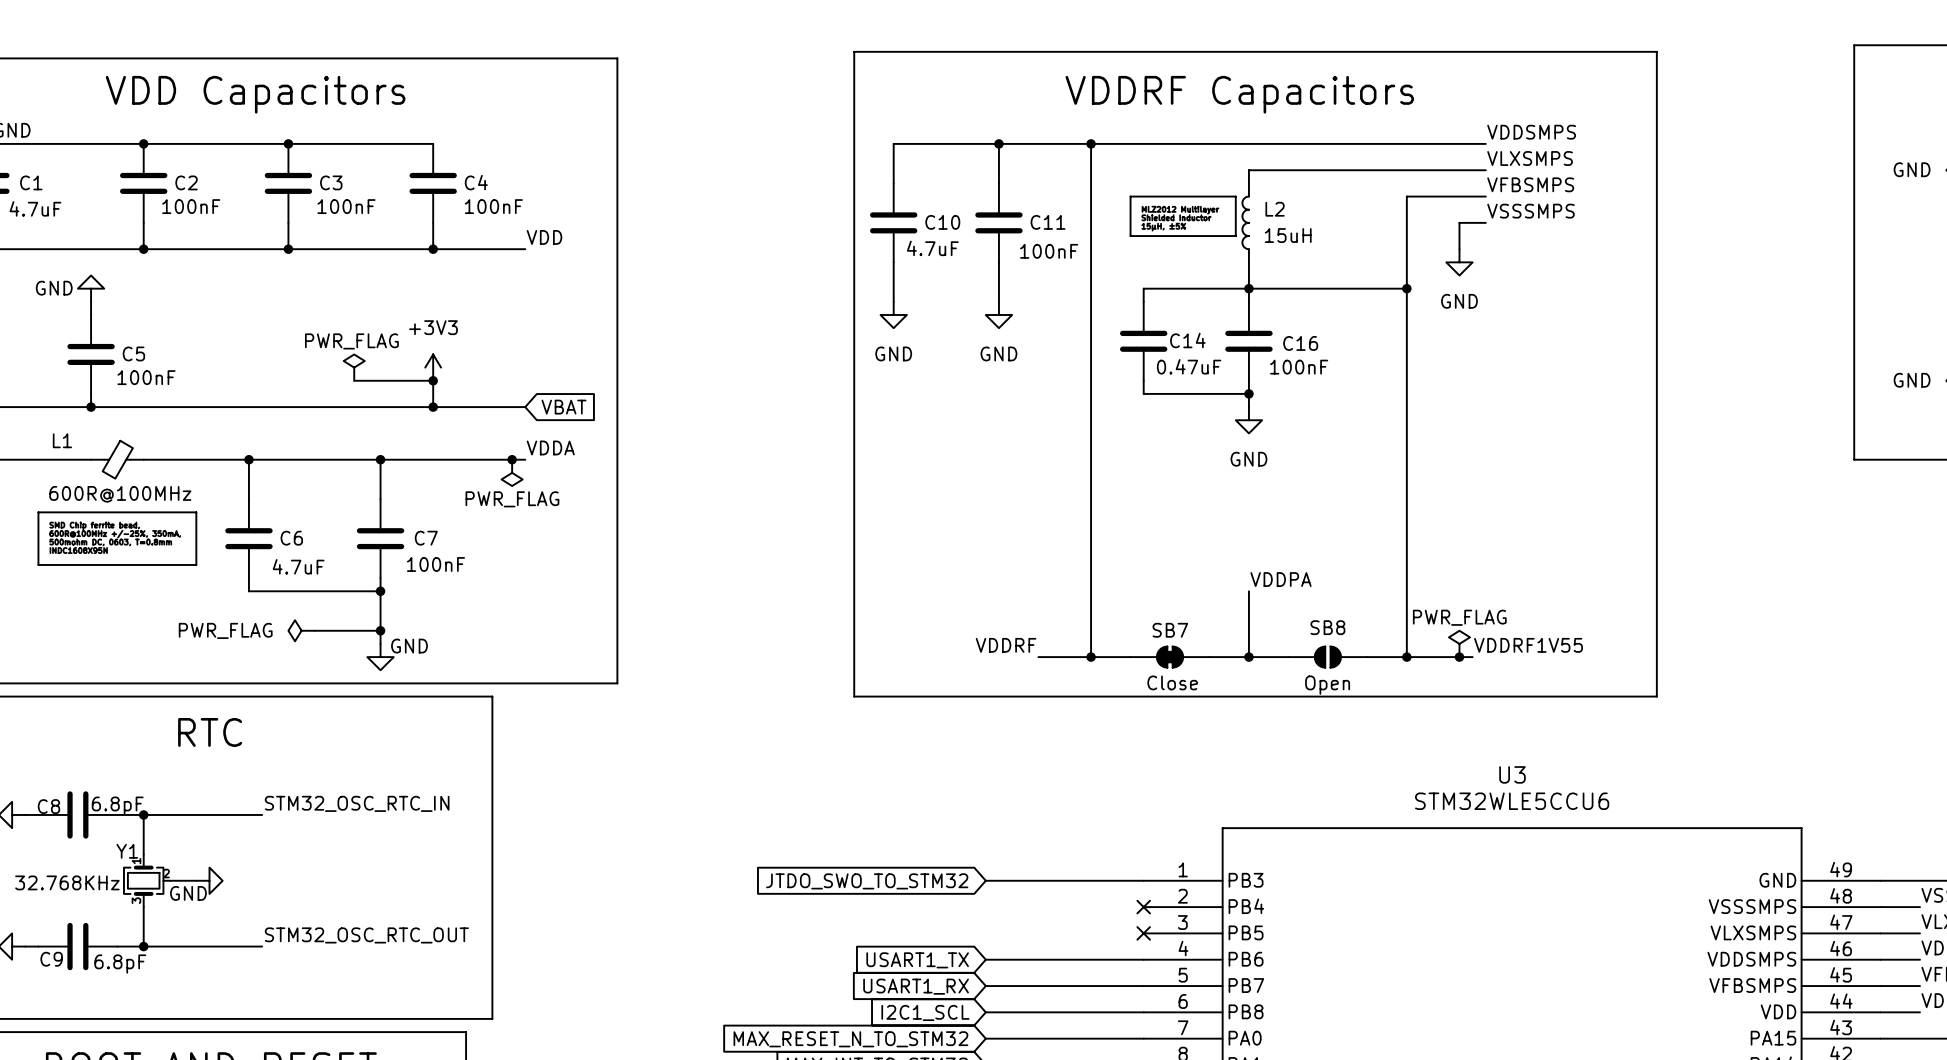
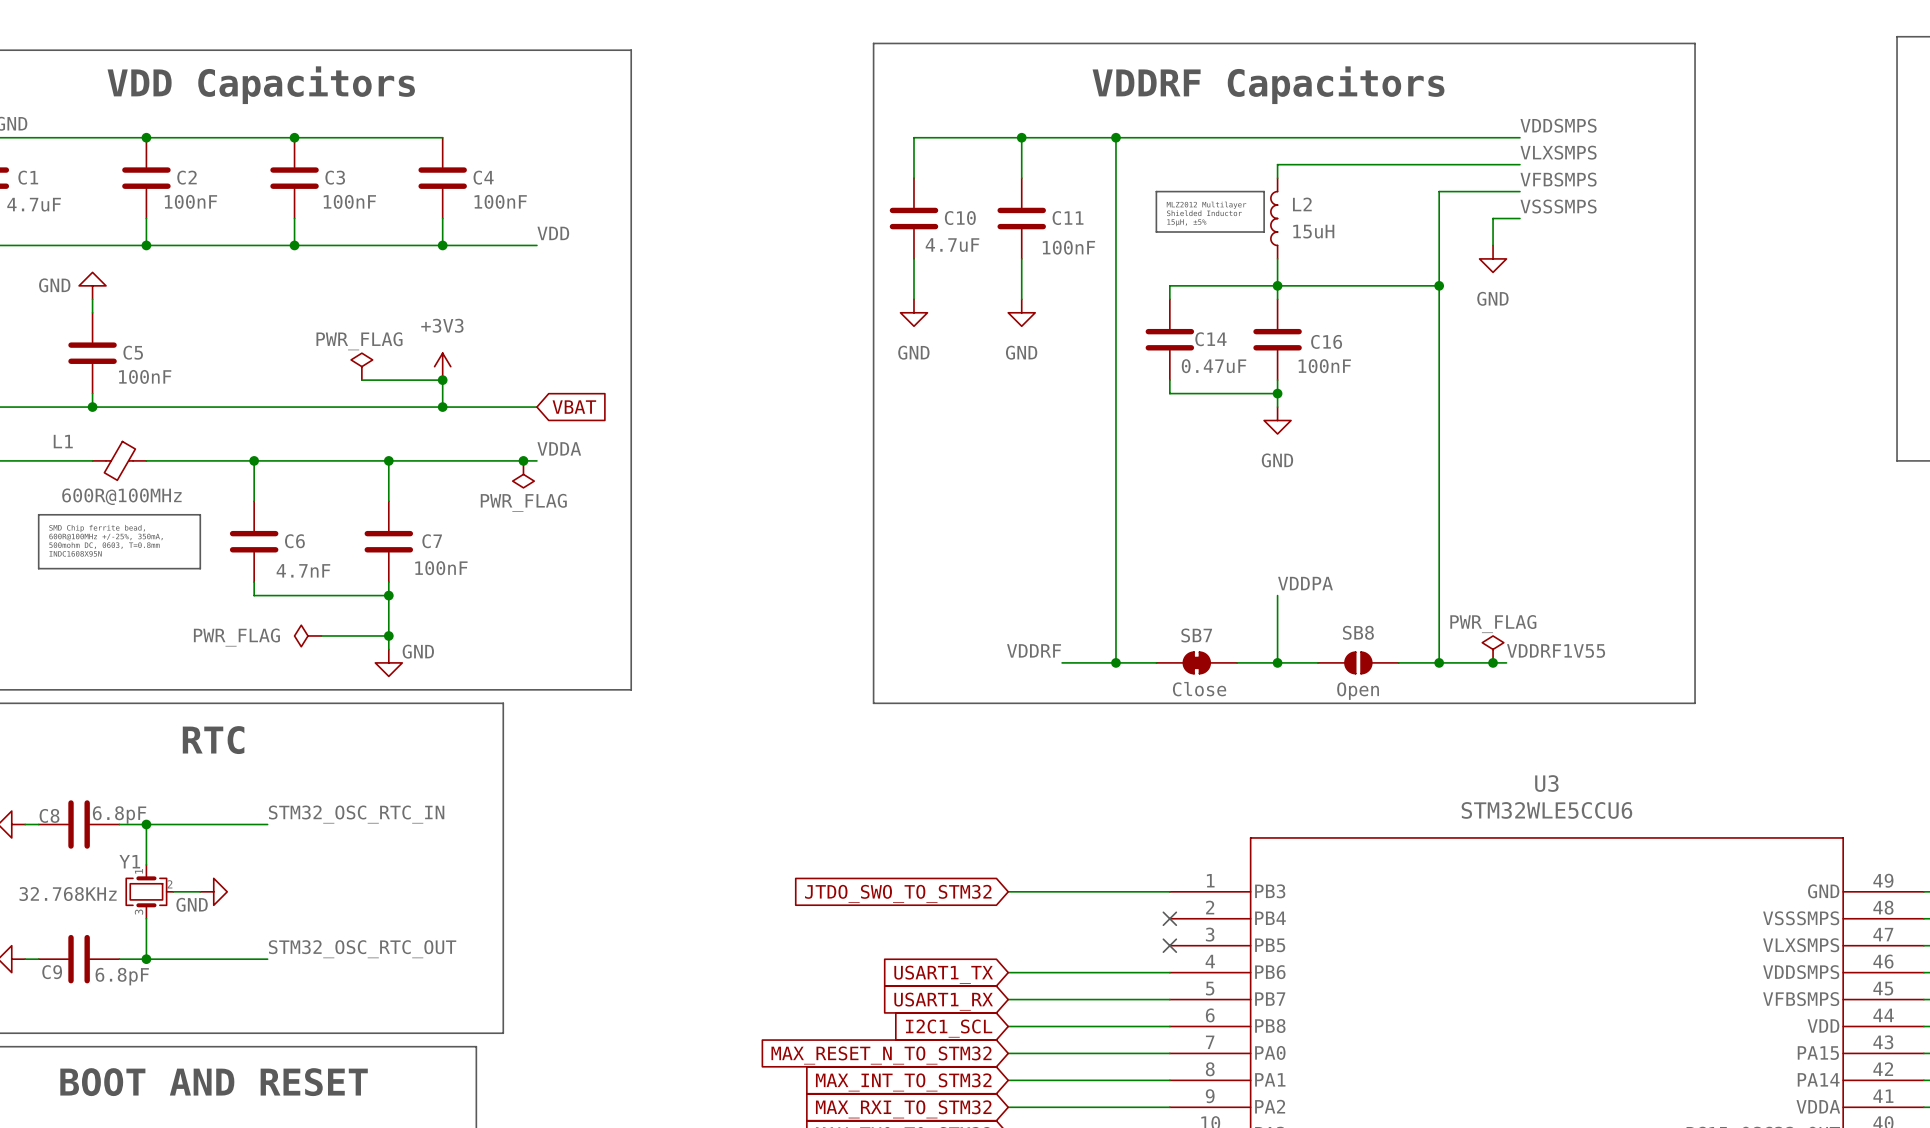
C6 value: 4.7uF (298, 566) -> 4.7nF (303, 570)

